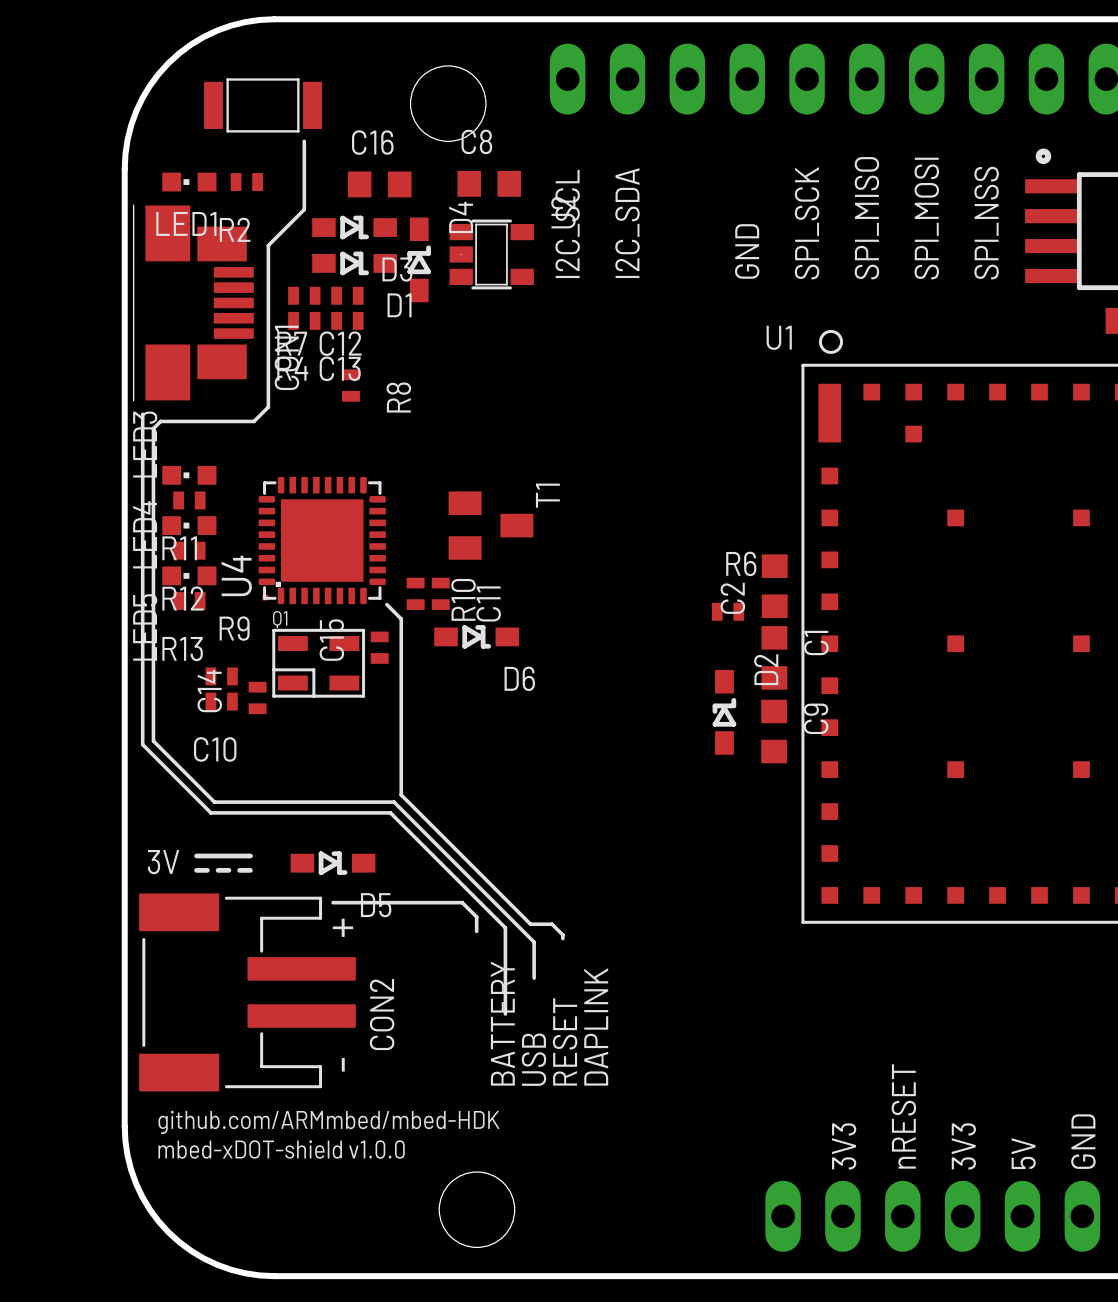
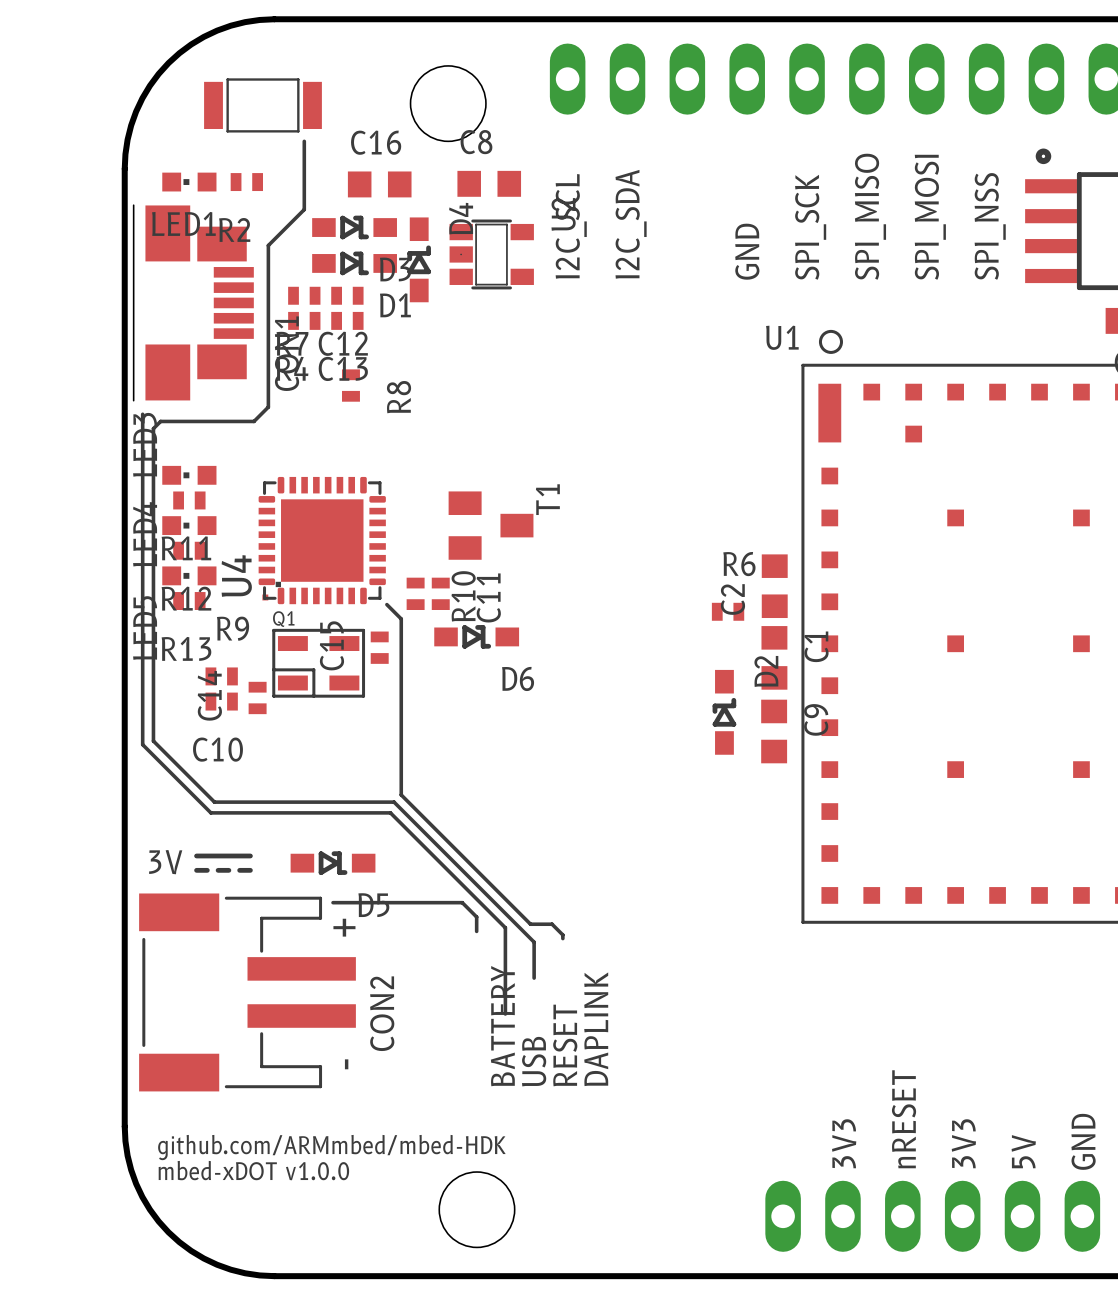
text: github.com/ARMmbed/mbed-HDK (328, 1122) -> none
text: mbed-xDOT-shield v1.0.0 (281, 1149) -> github.com/ARMmbed/mbed-HDK (331, 1147)
text: none -> mbed-xDOT v1.0.0 (253, 1170)

